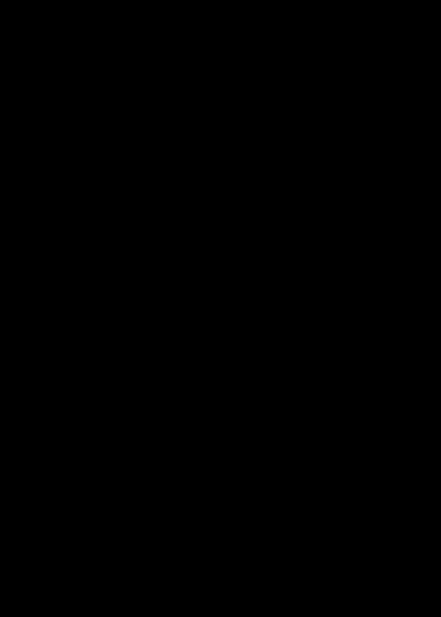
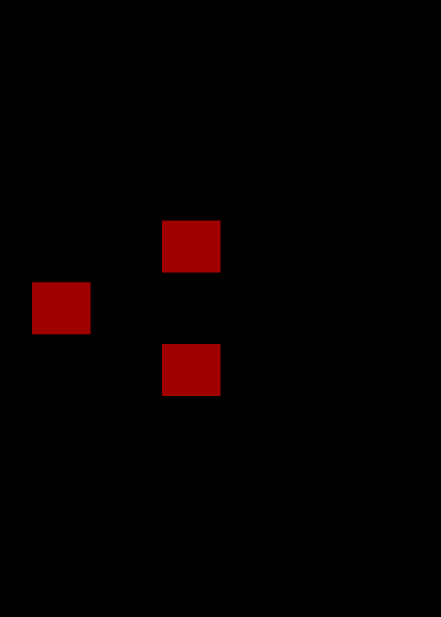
part: none -> (126, 308)

